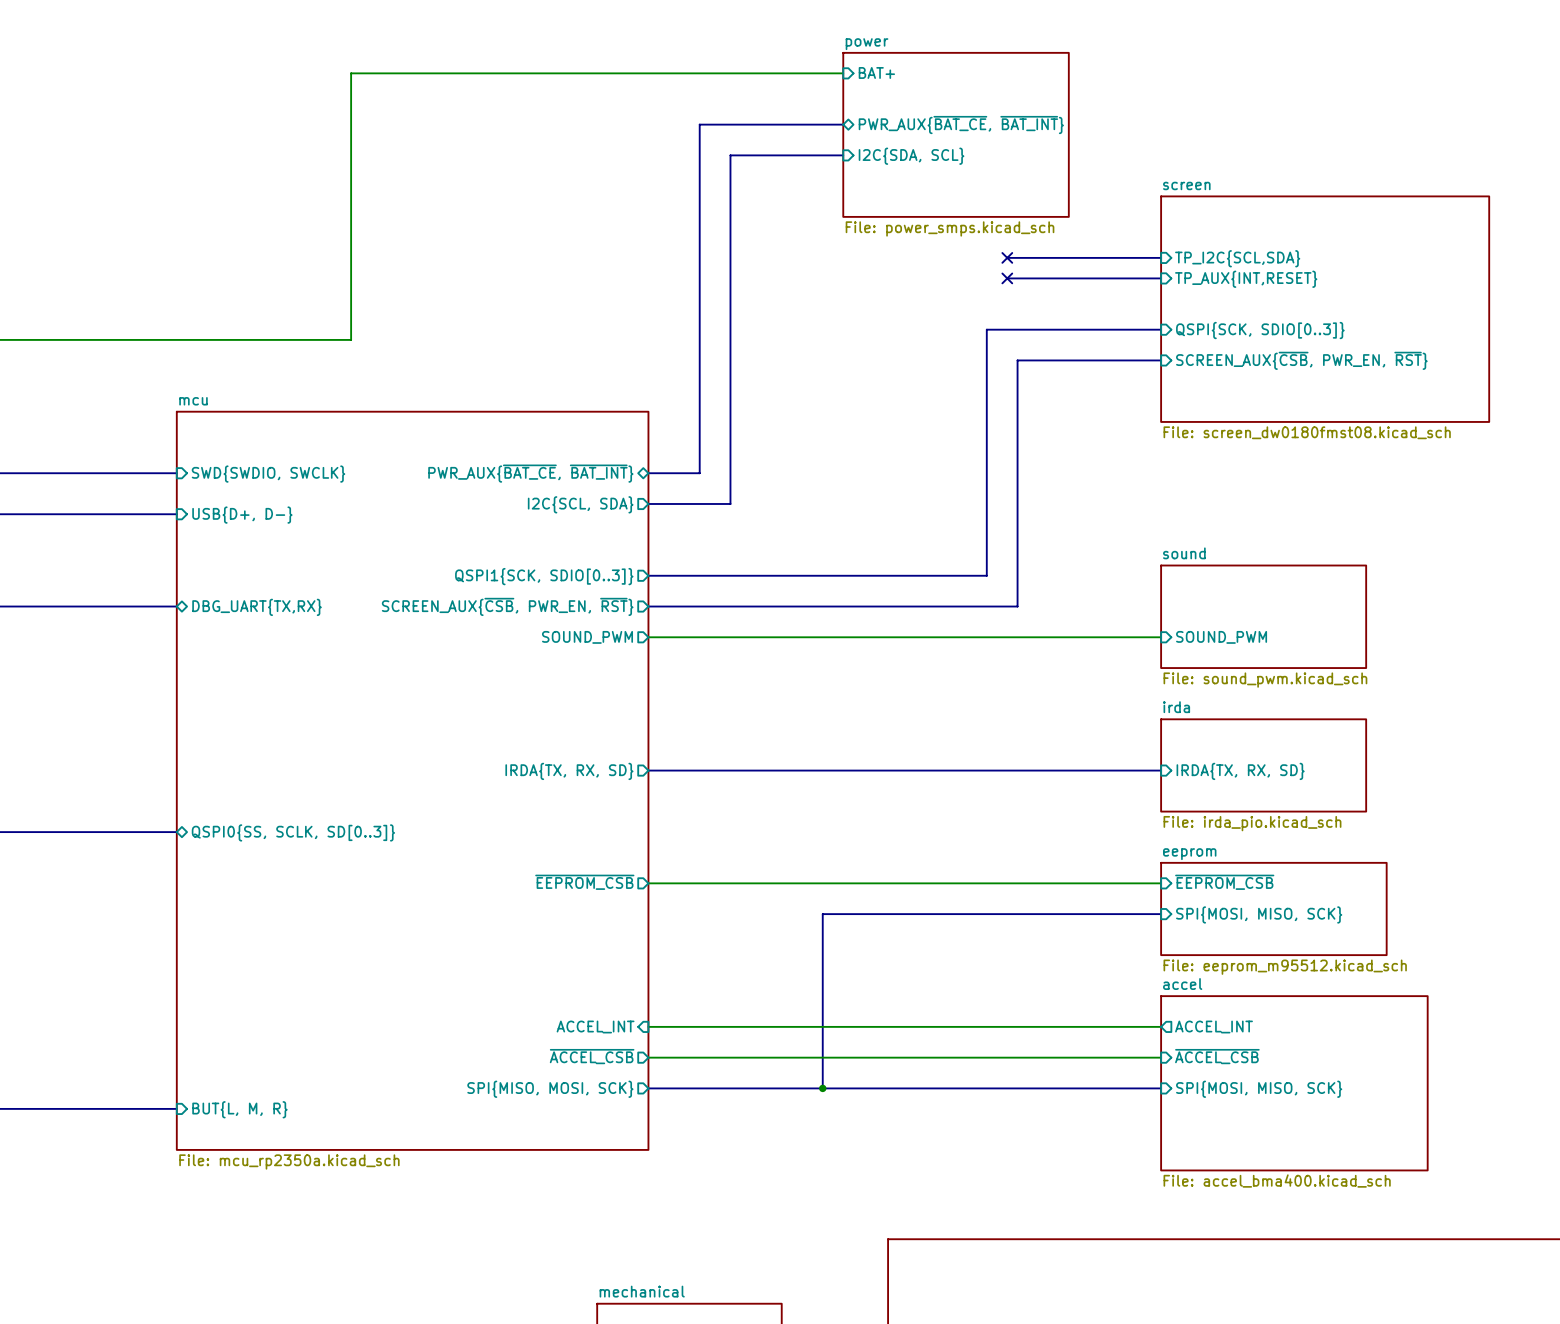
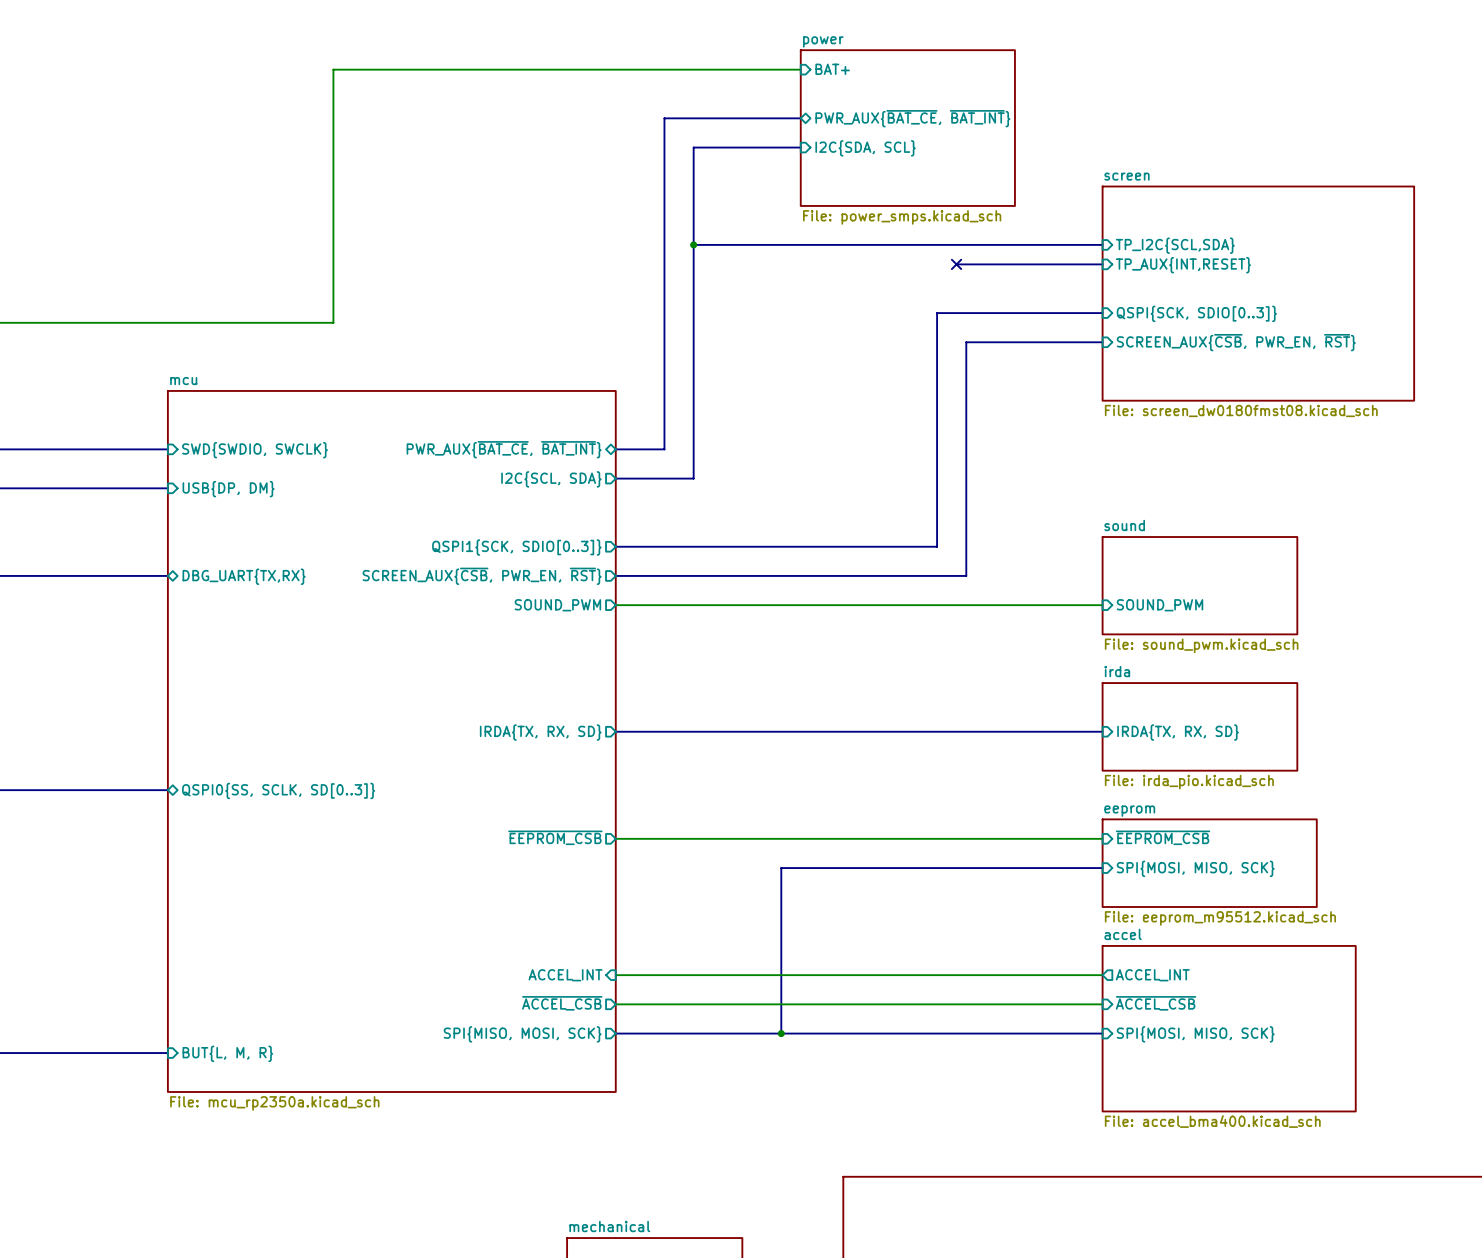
bus: none -> (693, 244) (956, 244)
junction: none -> (693, 244)
no-connect mark: (1007, 257) -> none
sheet pin: USB{D+, D-} (242, 515) -> USB{DP, DM} (228, 489)

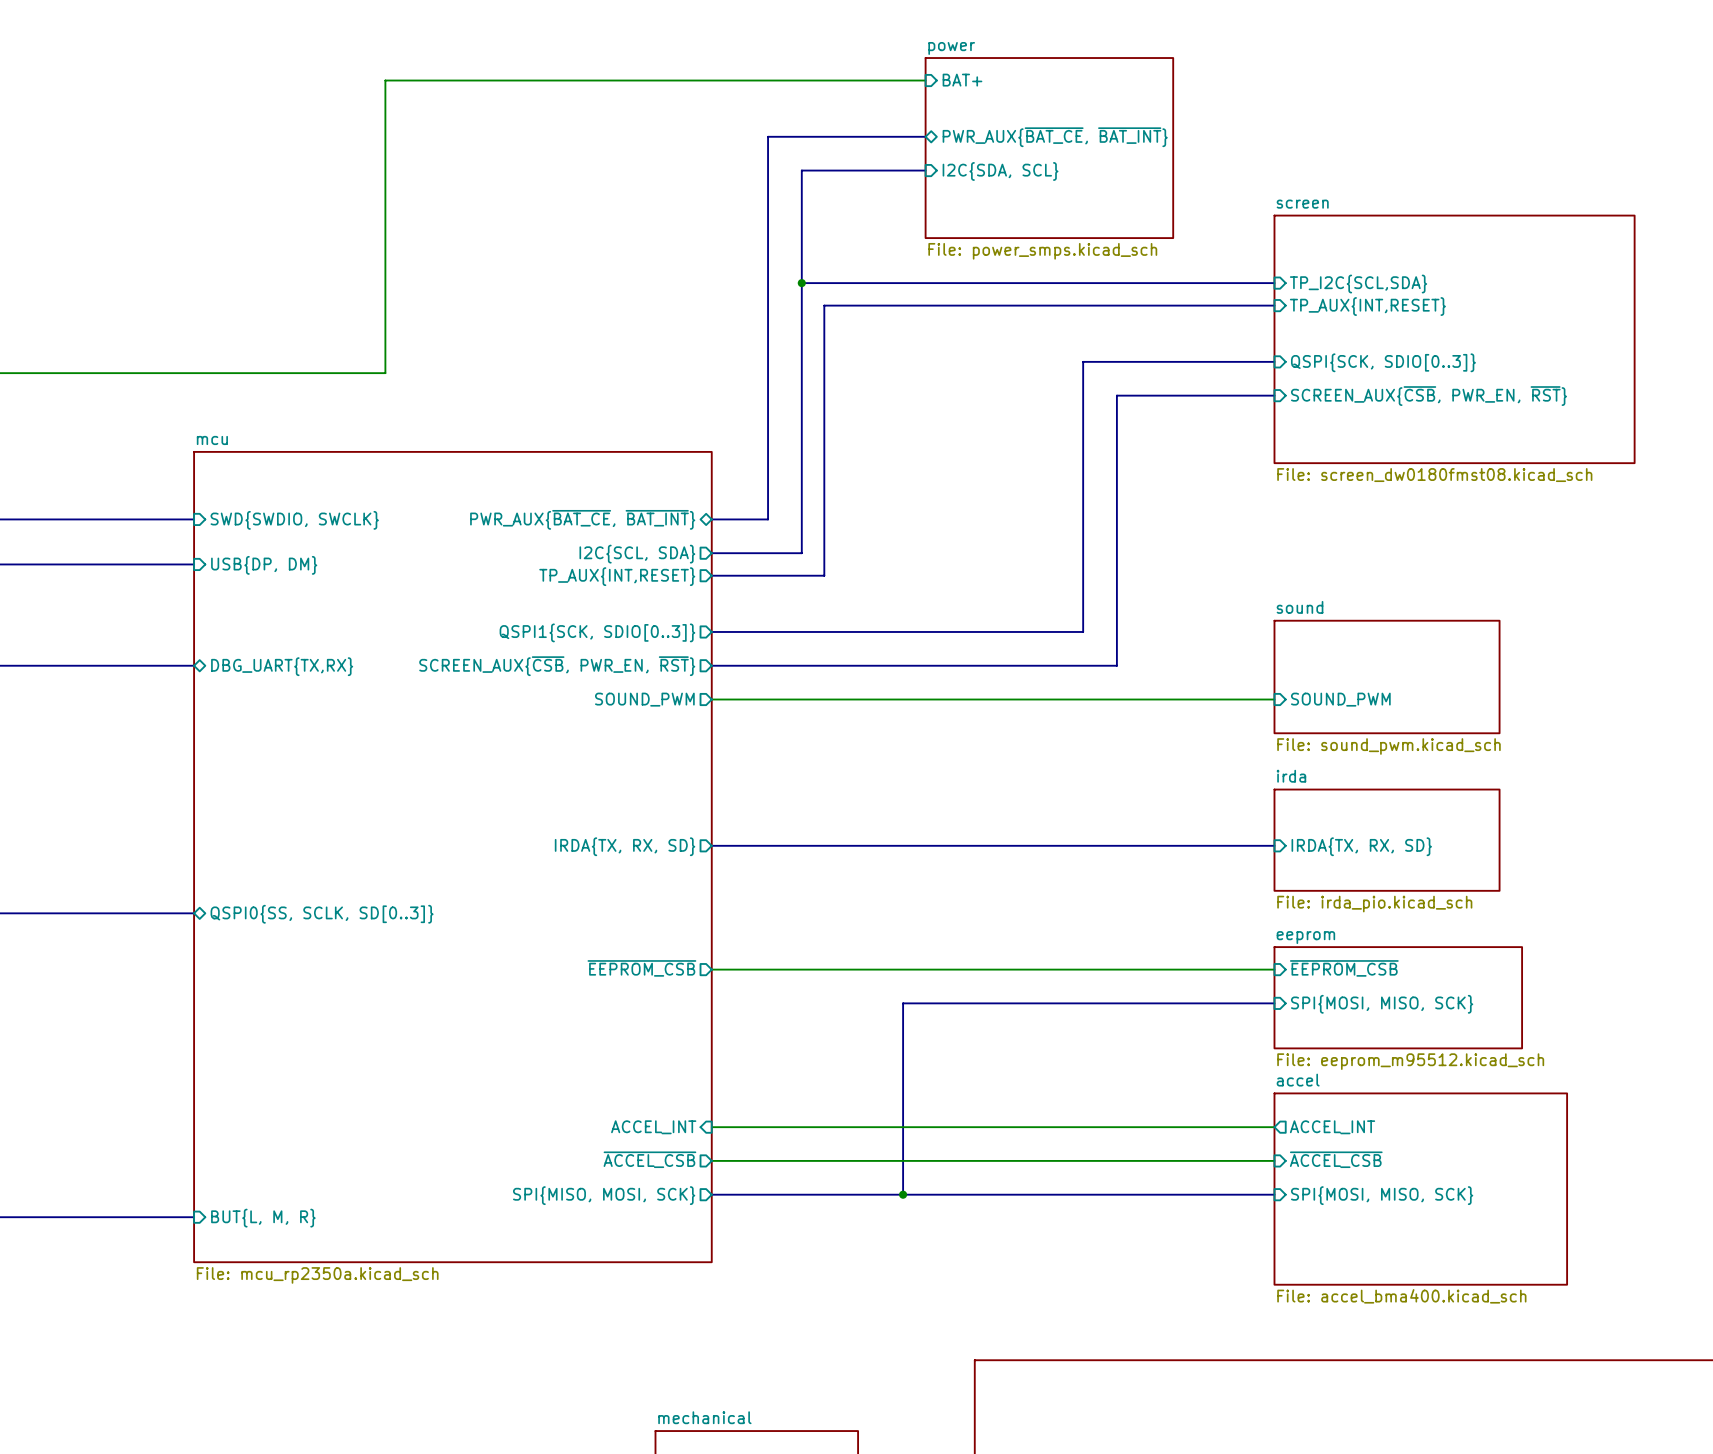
bus: none -> (1105, 305) (824, 305) (824, 575) (711, 575)
no-connect mark: (956, 264) -> none
sheet pin: none -> TP_AUX{INT,RESET} (617, 576)

